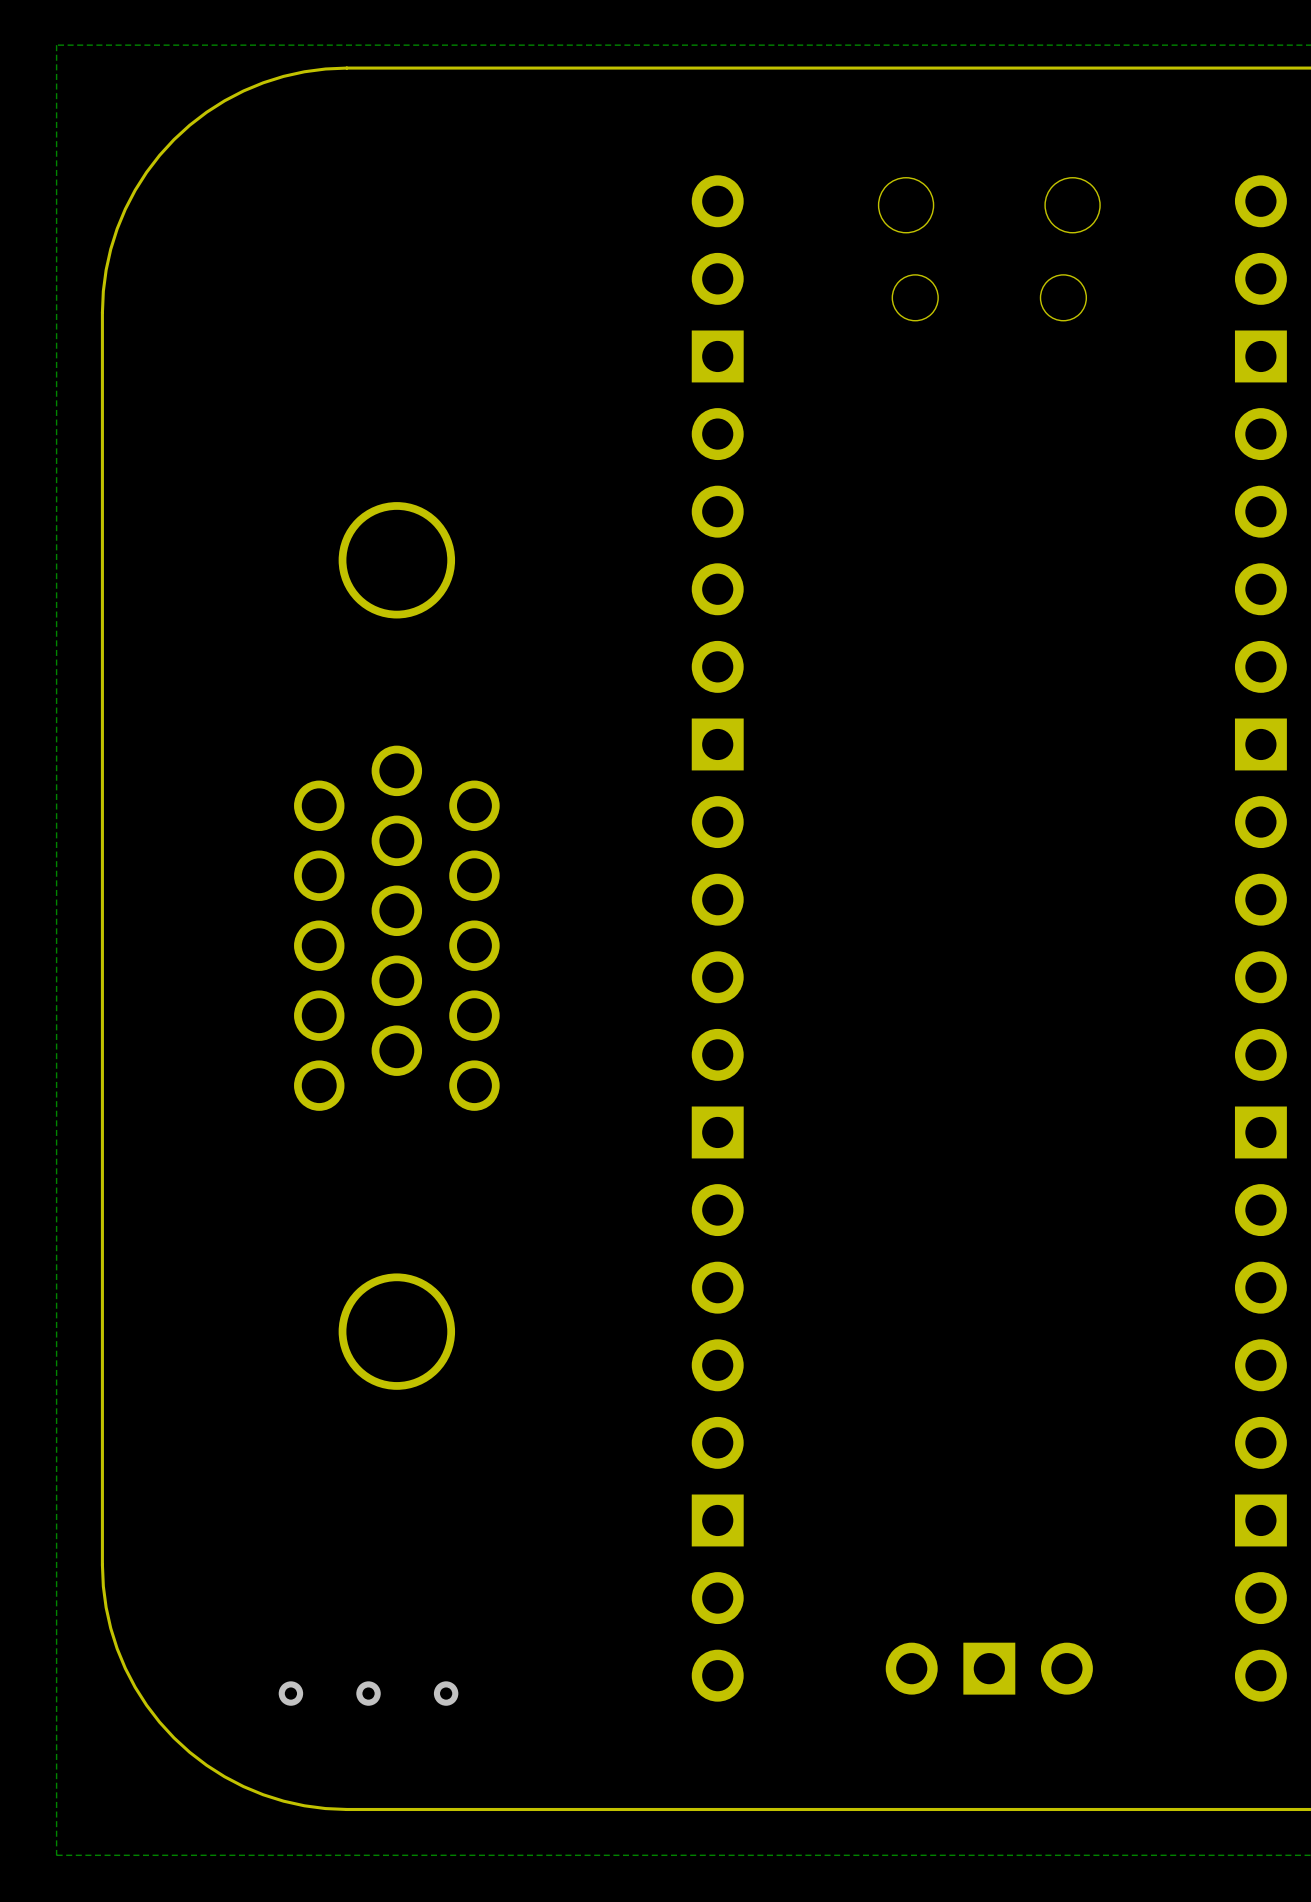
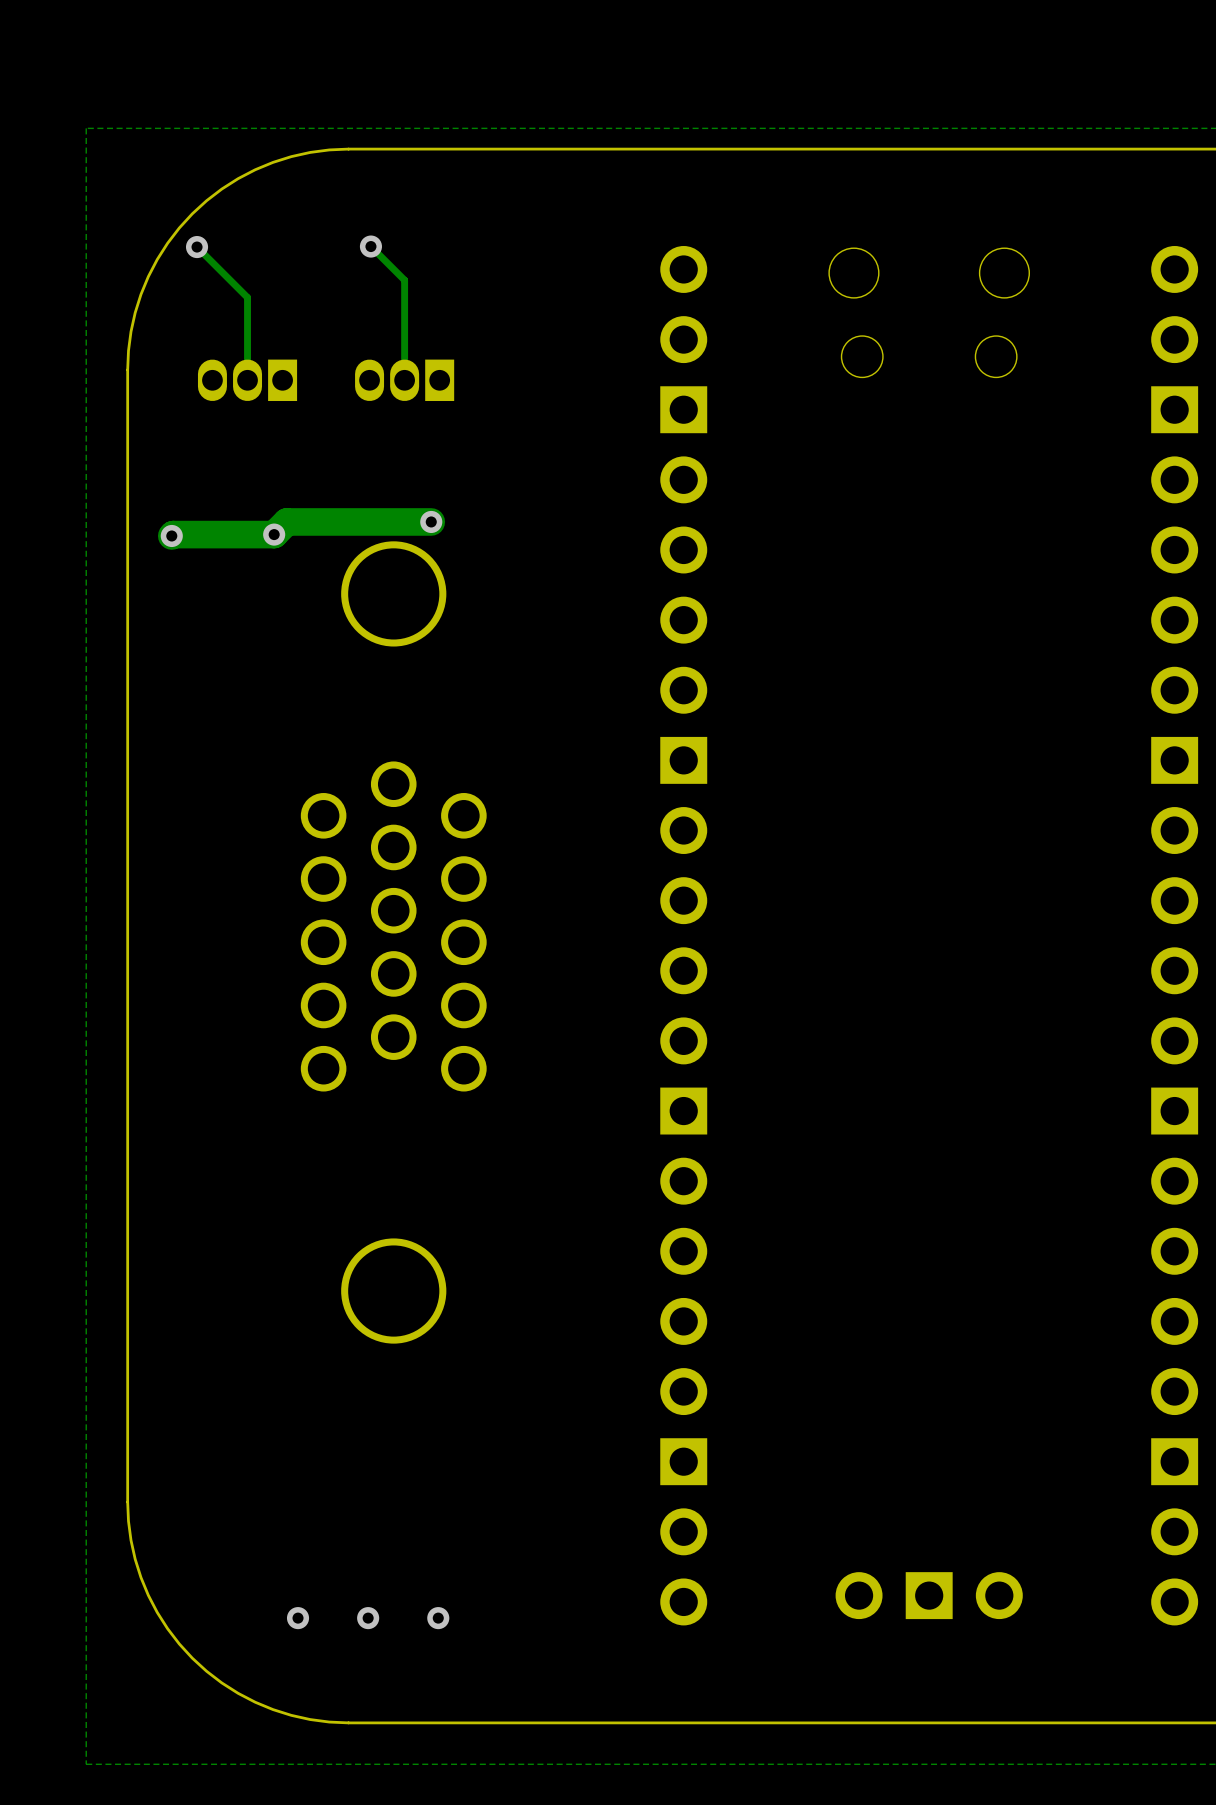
track: none -> (370, 246) (404, 280) (404, 380)
via: none -> (370, 246)
track: none -> (197, 247) (247, 297) (247, 380)
via: none -> (197, 247)
part: none -> (247, 380)
part: none -> (404, 380)
track: none -> (431, 521) (286, 521) (274, 534) (171, 535)
via: none -> (431, 521)
via: none -> (274, 534)
via: none -> (171, 535)

